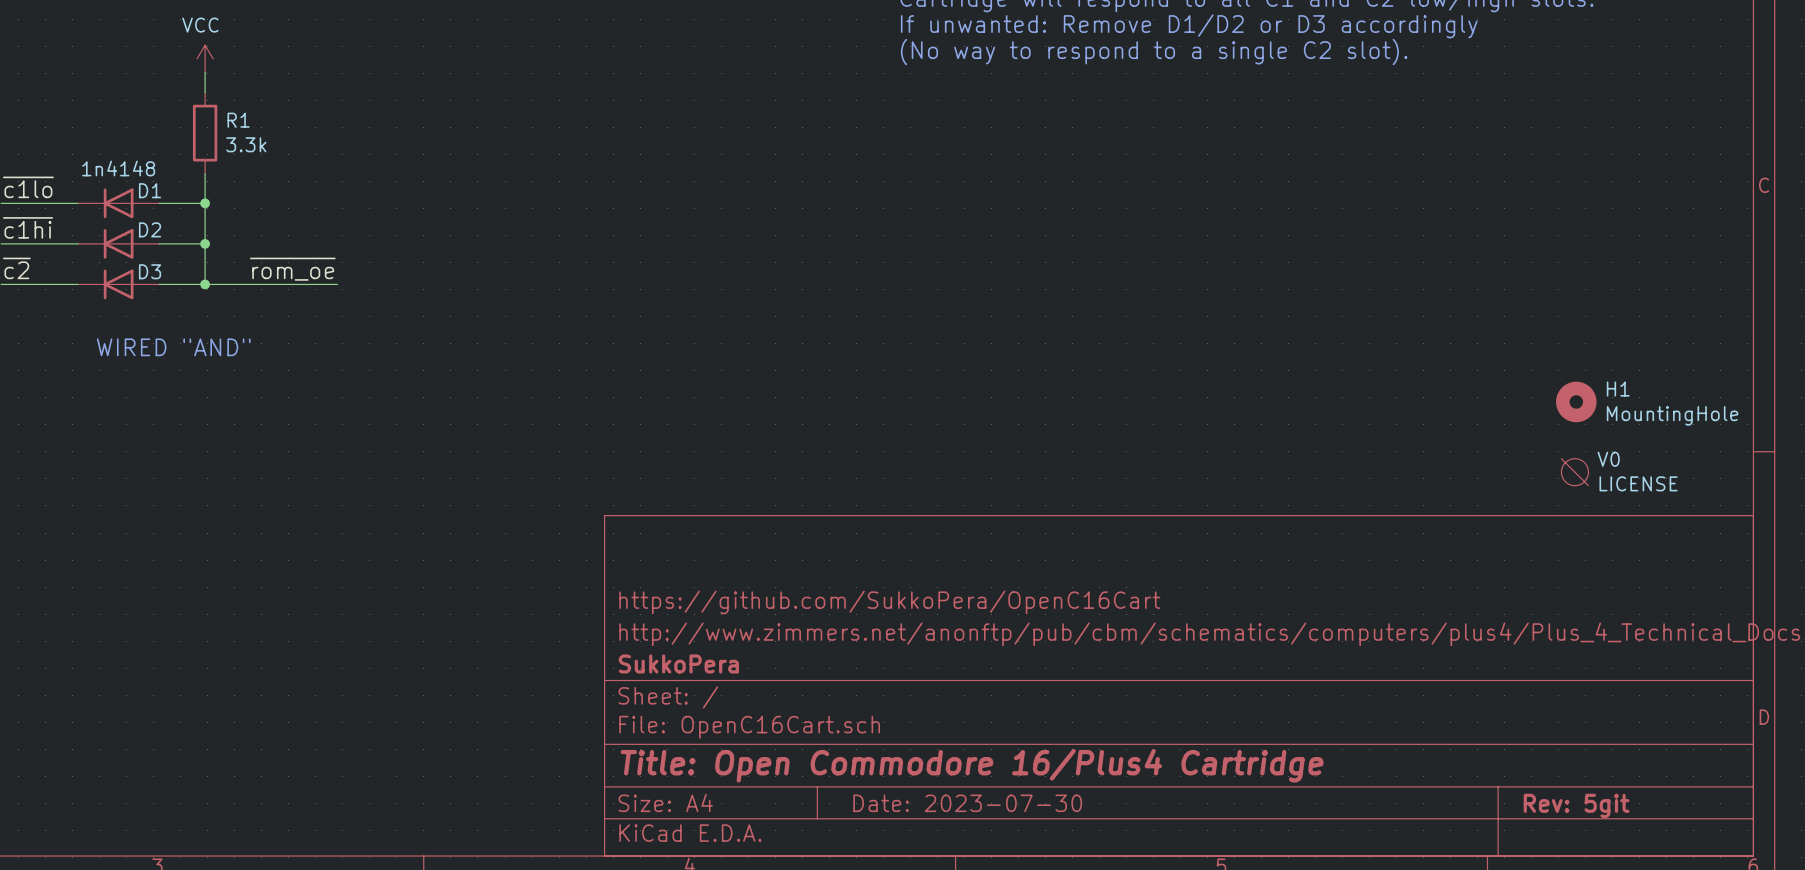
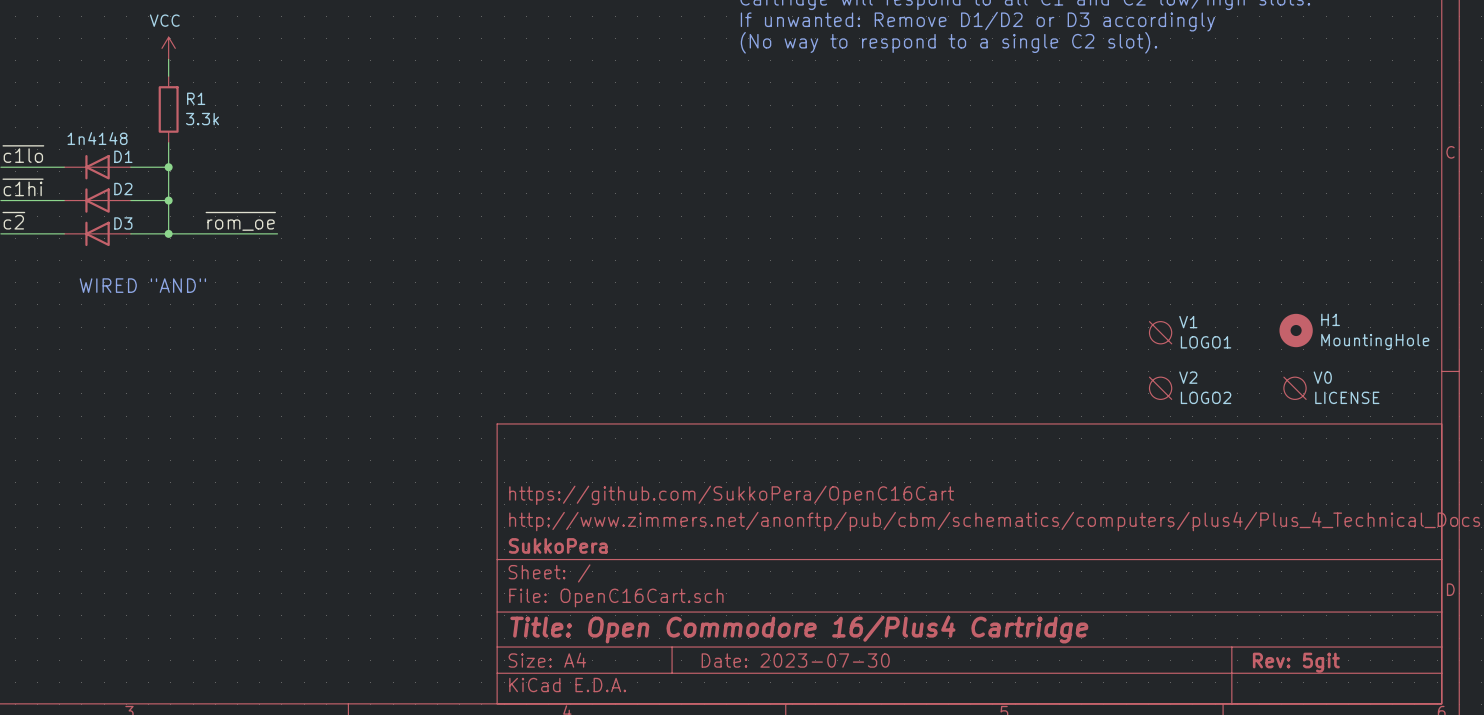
V1: none -> LOGO1 (1160, 332)
V2: none -> LOGO2 (1160, 388)

